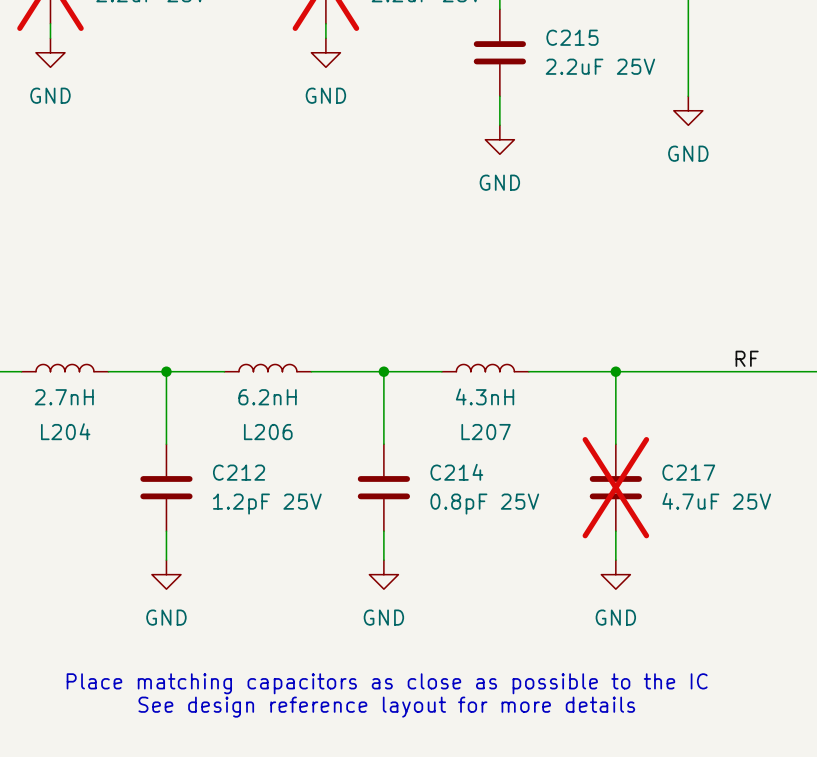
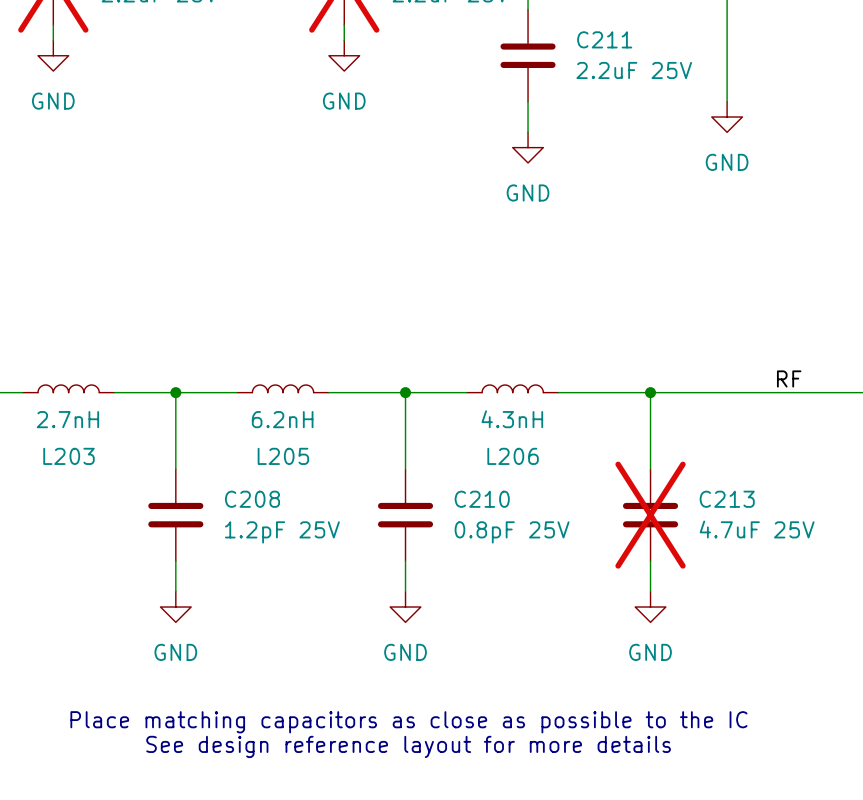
C215 name: C215 (572, 37) -> C211 (604, 39)
L204 name: L204 (65, 431) -> L203 (69, 456)
L206 name: L206 (268, 432) -> L205 (283, 456)
L207 name: L207 (486, 432) -> L206 (513, 456)
C212 name: C212 (239, 472) -> C208 (252, 499)
C214 name: C214 (456, 472) -> C210 (482, 499)
C217 name: C217 (688, 472) -> C213 (727, 499)

